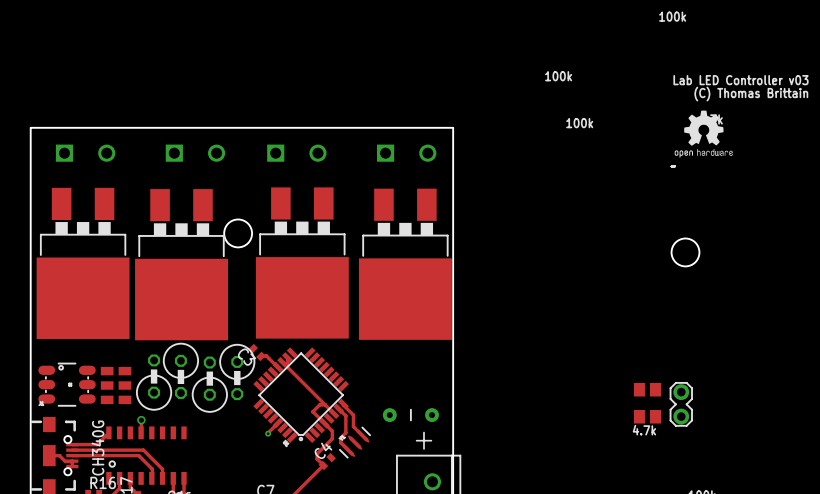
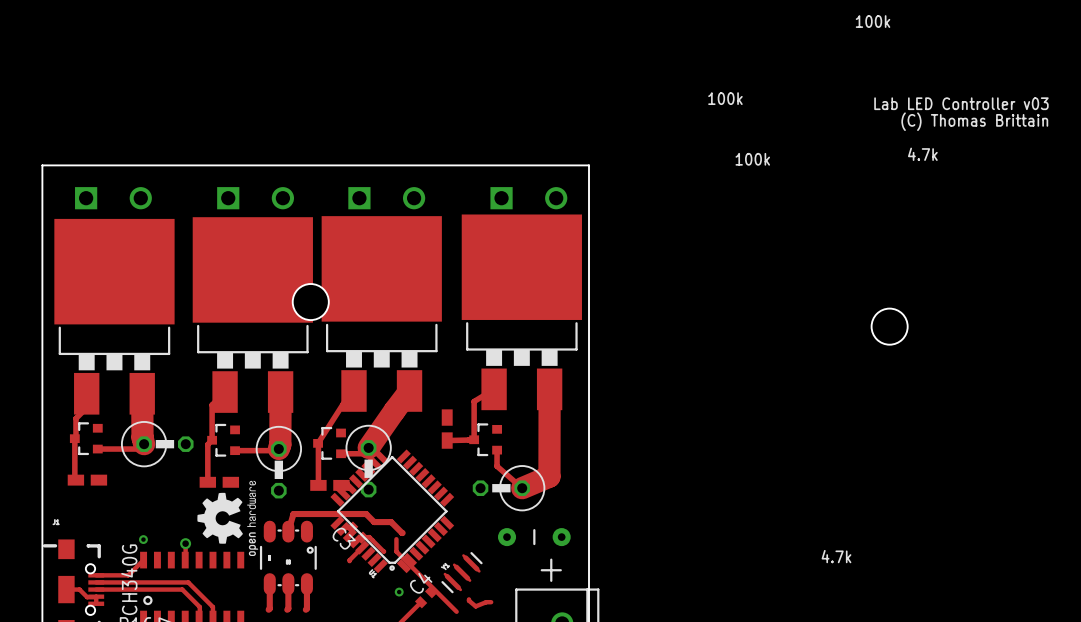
drawing: [674, 110, 733, 158] -> none
part rotation: 0° (83, 263) -> 180° (114, 316)
part rotation: 0° (302, 263) -> 180° (381, 313)
part rotation: 0° (181, 264) -> 180° (252, 315)
part rotation: 0° (405, 264) -> 180° (521, 312)
track: none -> (494, 389) (474, 401) (474, 439) (447, 440)
track: none -> (549, 389) (549, 476) (522, 488) (497, 466) (497, 450)
track: none -> (225, 392) (212, 405) (212, 440) (207, 444) (207, 482)
track: none -> (280, 392) (278, 449) (275, 450) (235, 450)
track: none -> (354, 390) (343, 403) (318, 443) (318, 485)
track: none -> (409, 390) (364, 453) (341, 453)
track: none -> (86, 393) (91, 403) (75, 418) (75, 480)
track: none -> (142, 393) (144, 444) (142, 449) (97, 449)
part: none -> (447, 429)
part: none -> (86, 438)
part: none -> (485, 439)
part: none -> (223, 440)
part: none -> (329, 443)
part: none -> (157, 444)
C3 position: (257, 352) -> (357, 532)
track: (260, 356) (266, 355) (277, 367) -> (362, 537) (369, 537) (384, 551)
part: none -> (368, 461)
part: none -> (278, 462)
track: (287, 357) (287, 367) (333, 413) -> (396, 539) (396, 551) (456, 611)
part: none -> (87, 480)
part: (116, 371) -> none
drawing: none -> [197, 480, 259, 556]
part: (180, 371) -> none
part: none -> (219, 482)
part: (237, 372) -> none
part: none -> (329, 485)
part: none -> (509, 488)
part: (154, 382) -> none
part rotation: 0° (67, 384) -> 90° clockwise (288, 557)
part position: (67, 384) -> (288, 557)
part: (209, 384) -> none
part: (116, 385) -> none
part: (647, 389) -> none
part: (116, 399) -> none
track: (325, 404) (319, 404) (312, 411) (332, 431) (332, 438) (317, 453) (317, 459) (323, 465) -> none
track: (343, 404) (353, 415) (353, 426) (356, 429) -> none
part: (681, 404) -> none
track: (338, 408) (345, 415) (345, 432) (340, 437) (340, 442) (347, 449) -> none
track: none -> (288, 531) (293, 514) (366, 514) (374, 522) (391, 522) (402, 533)
via: none -> (143, 539)
part: (647, 416) -> none
via: (268, 433) -> none
track: none -> (269, 584) (268, 609)
track: none -> (288, 584) (287, 609)
track: none -> (306, 584) (305, 609)
via: none -> (399, 592)
track: none -> (468, 599) (475, 606) (491, 602)

